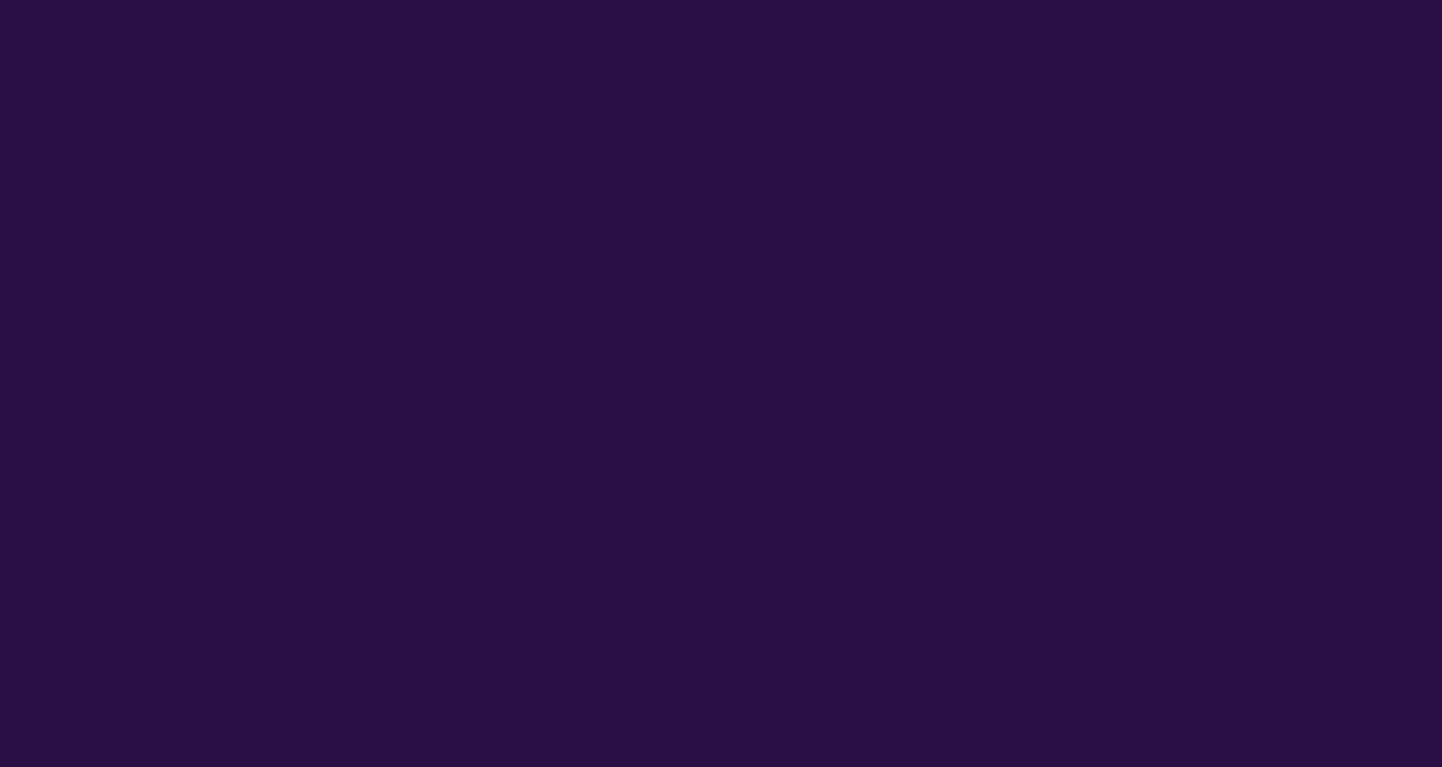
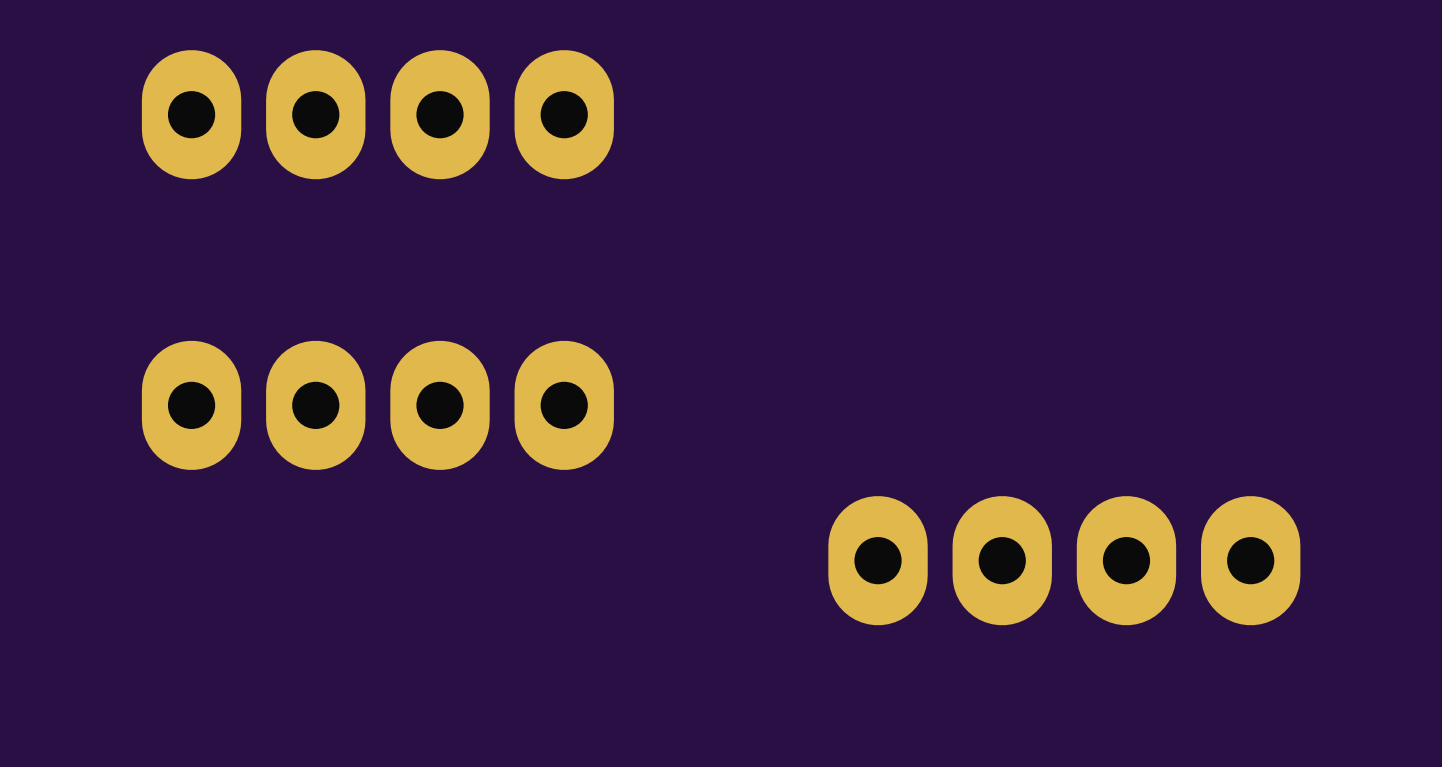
part: none -> (377, 114)
part: none -> (377, 405)
part: none -> (1064, 560)

